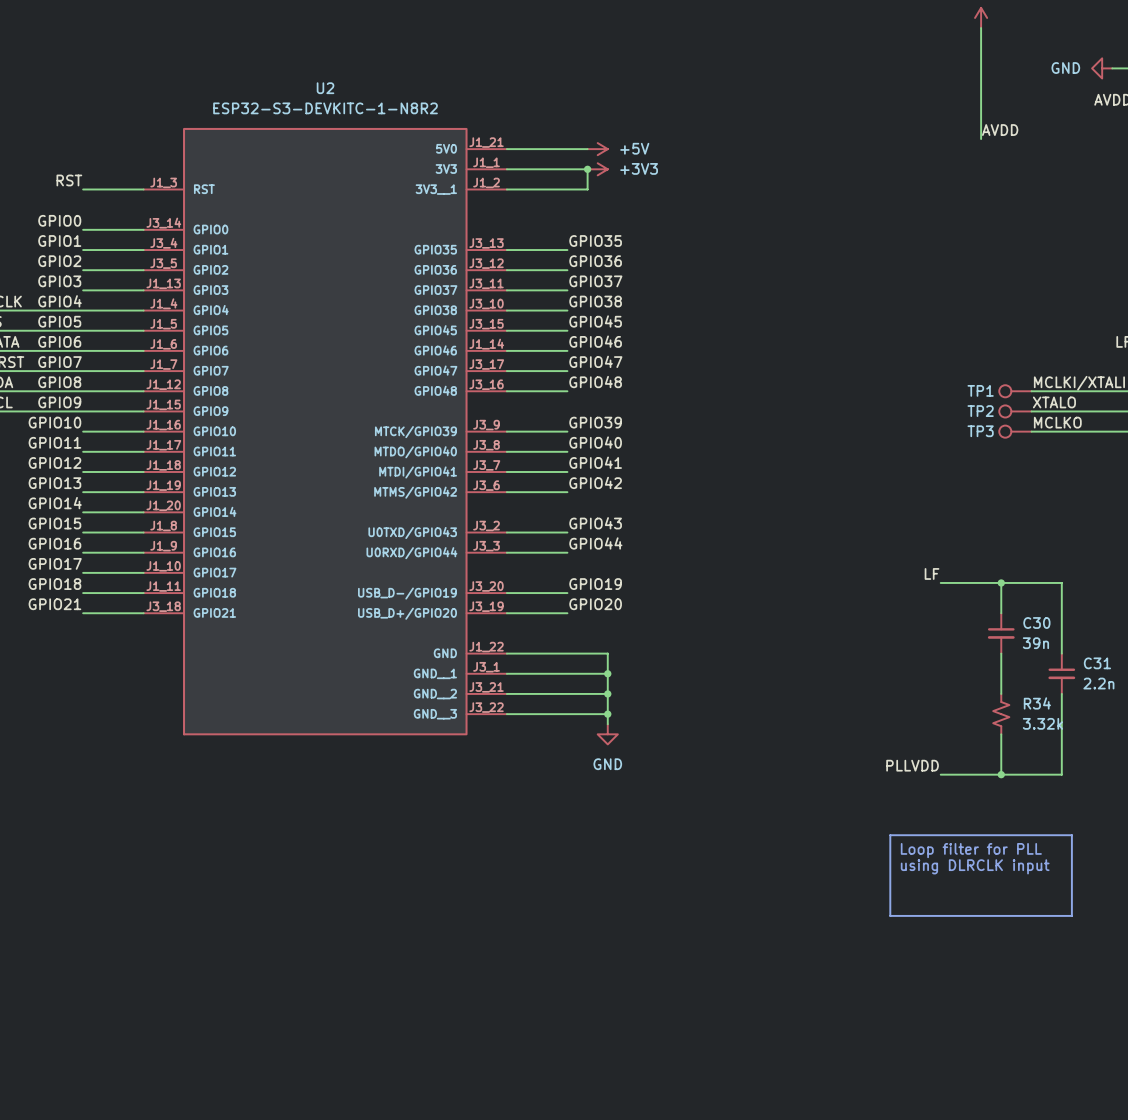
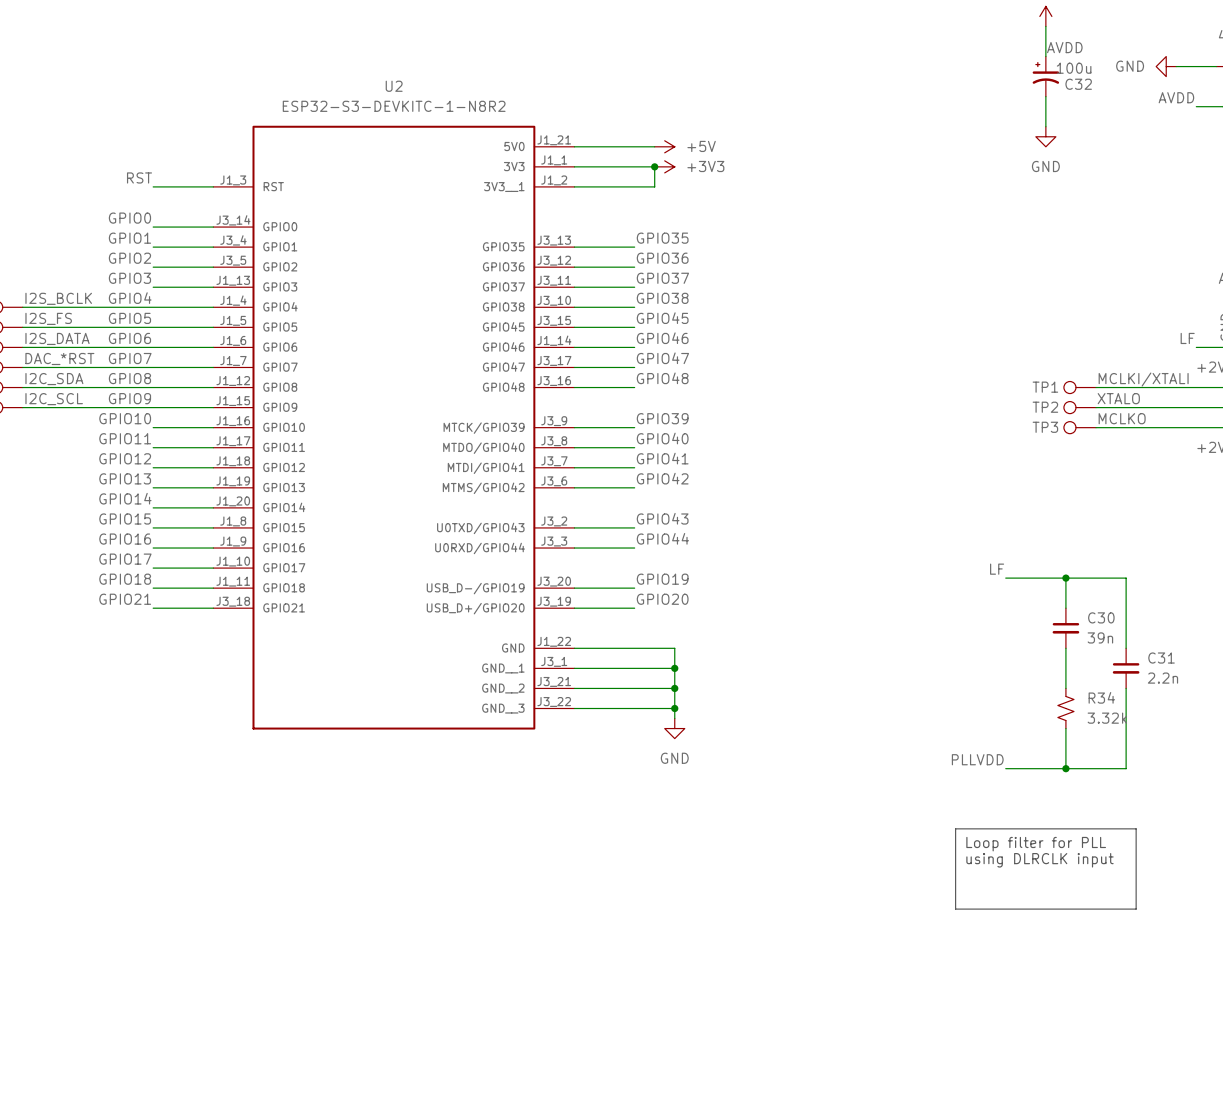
C32: none -> 100u (1045, 76)
label position: AVDD (1000, 130) -> AVDD (1064, 47)
power symbol: none -> GND (1045, 136)

